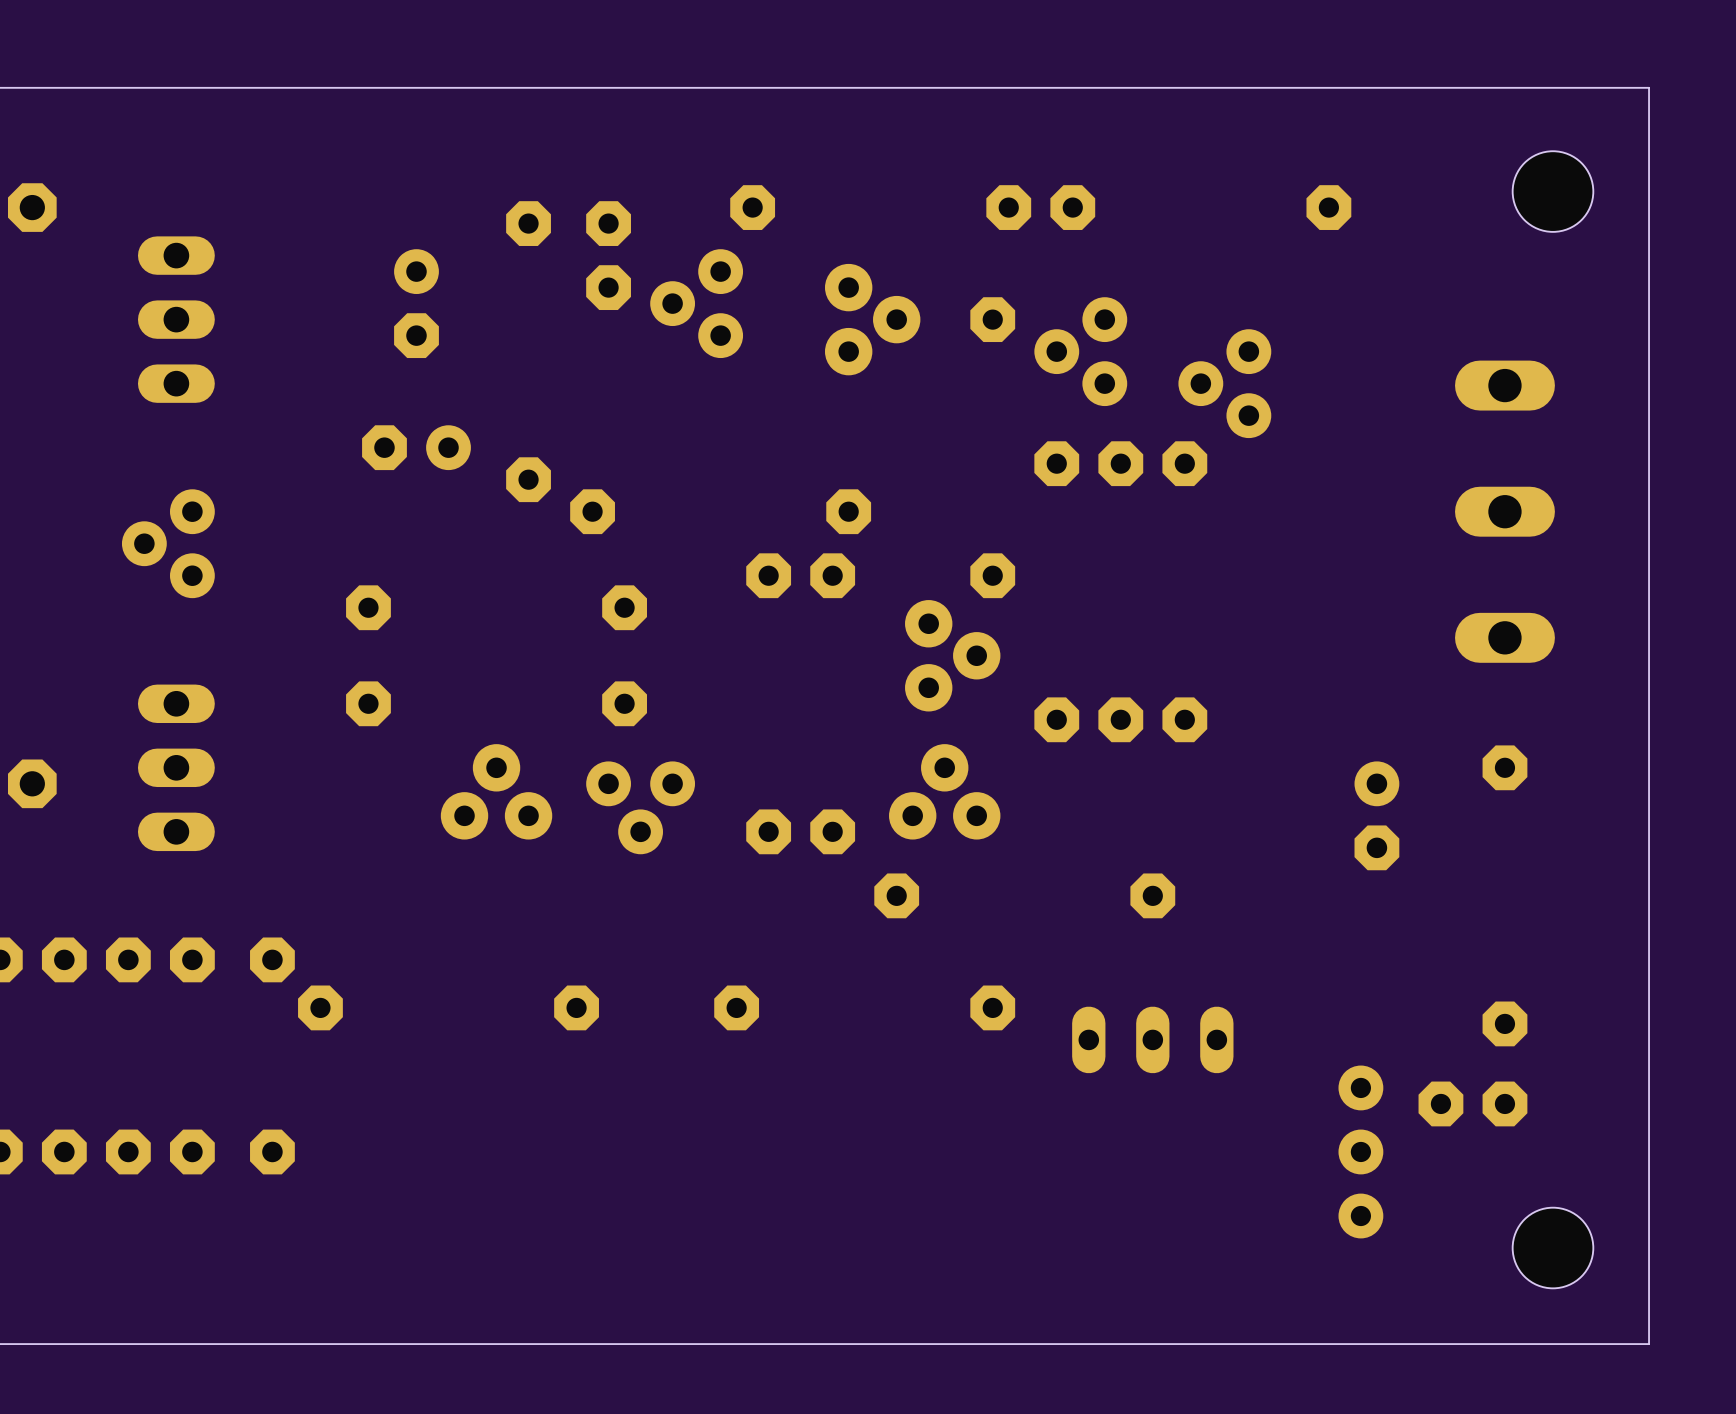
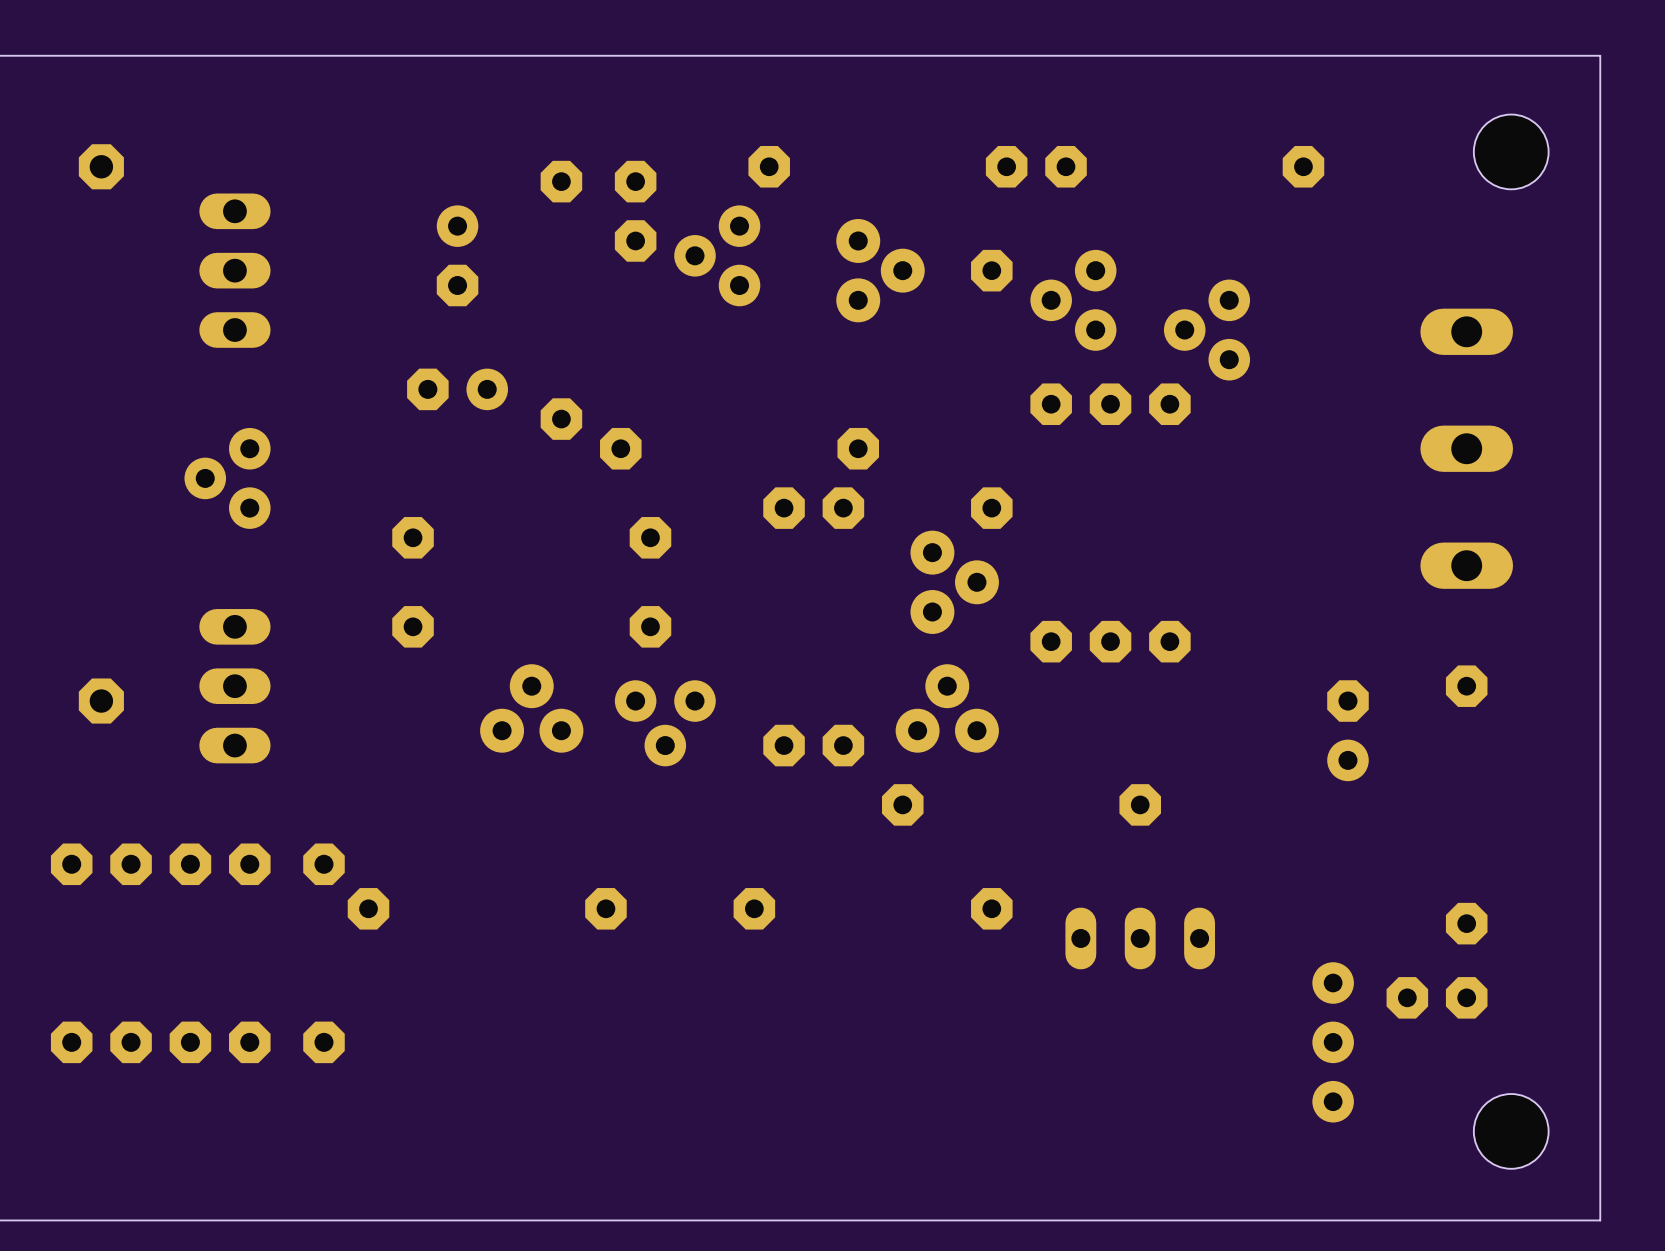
part rotation: 0° (1376, 815) -> 180° (1347, 730)

